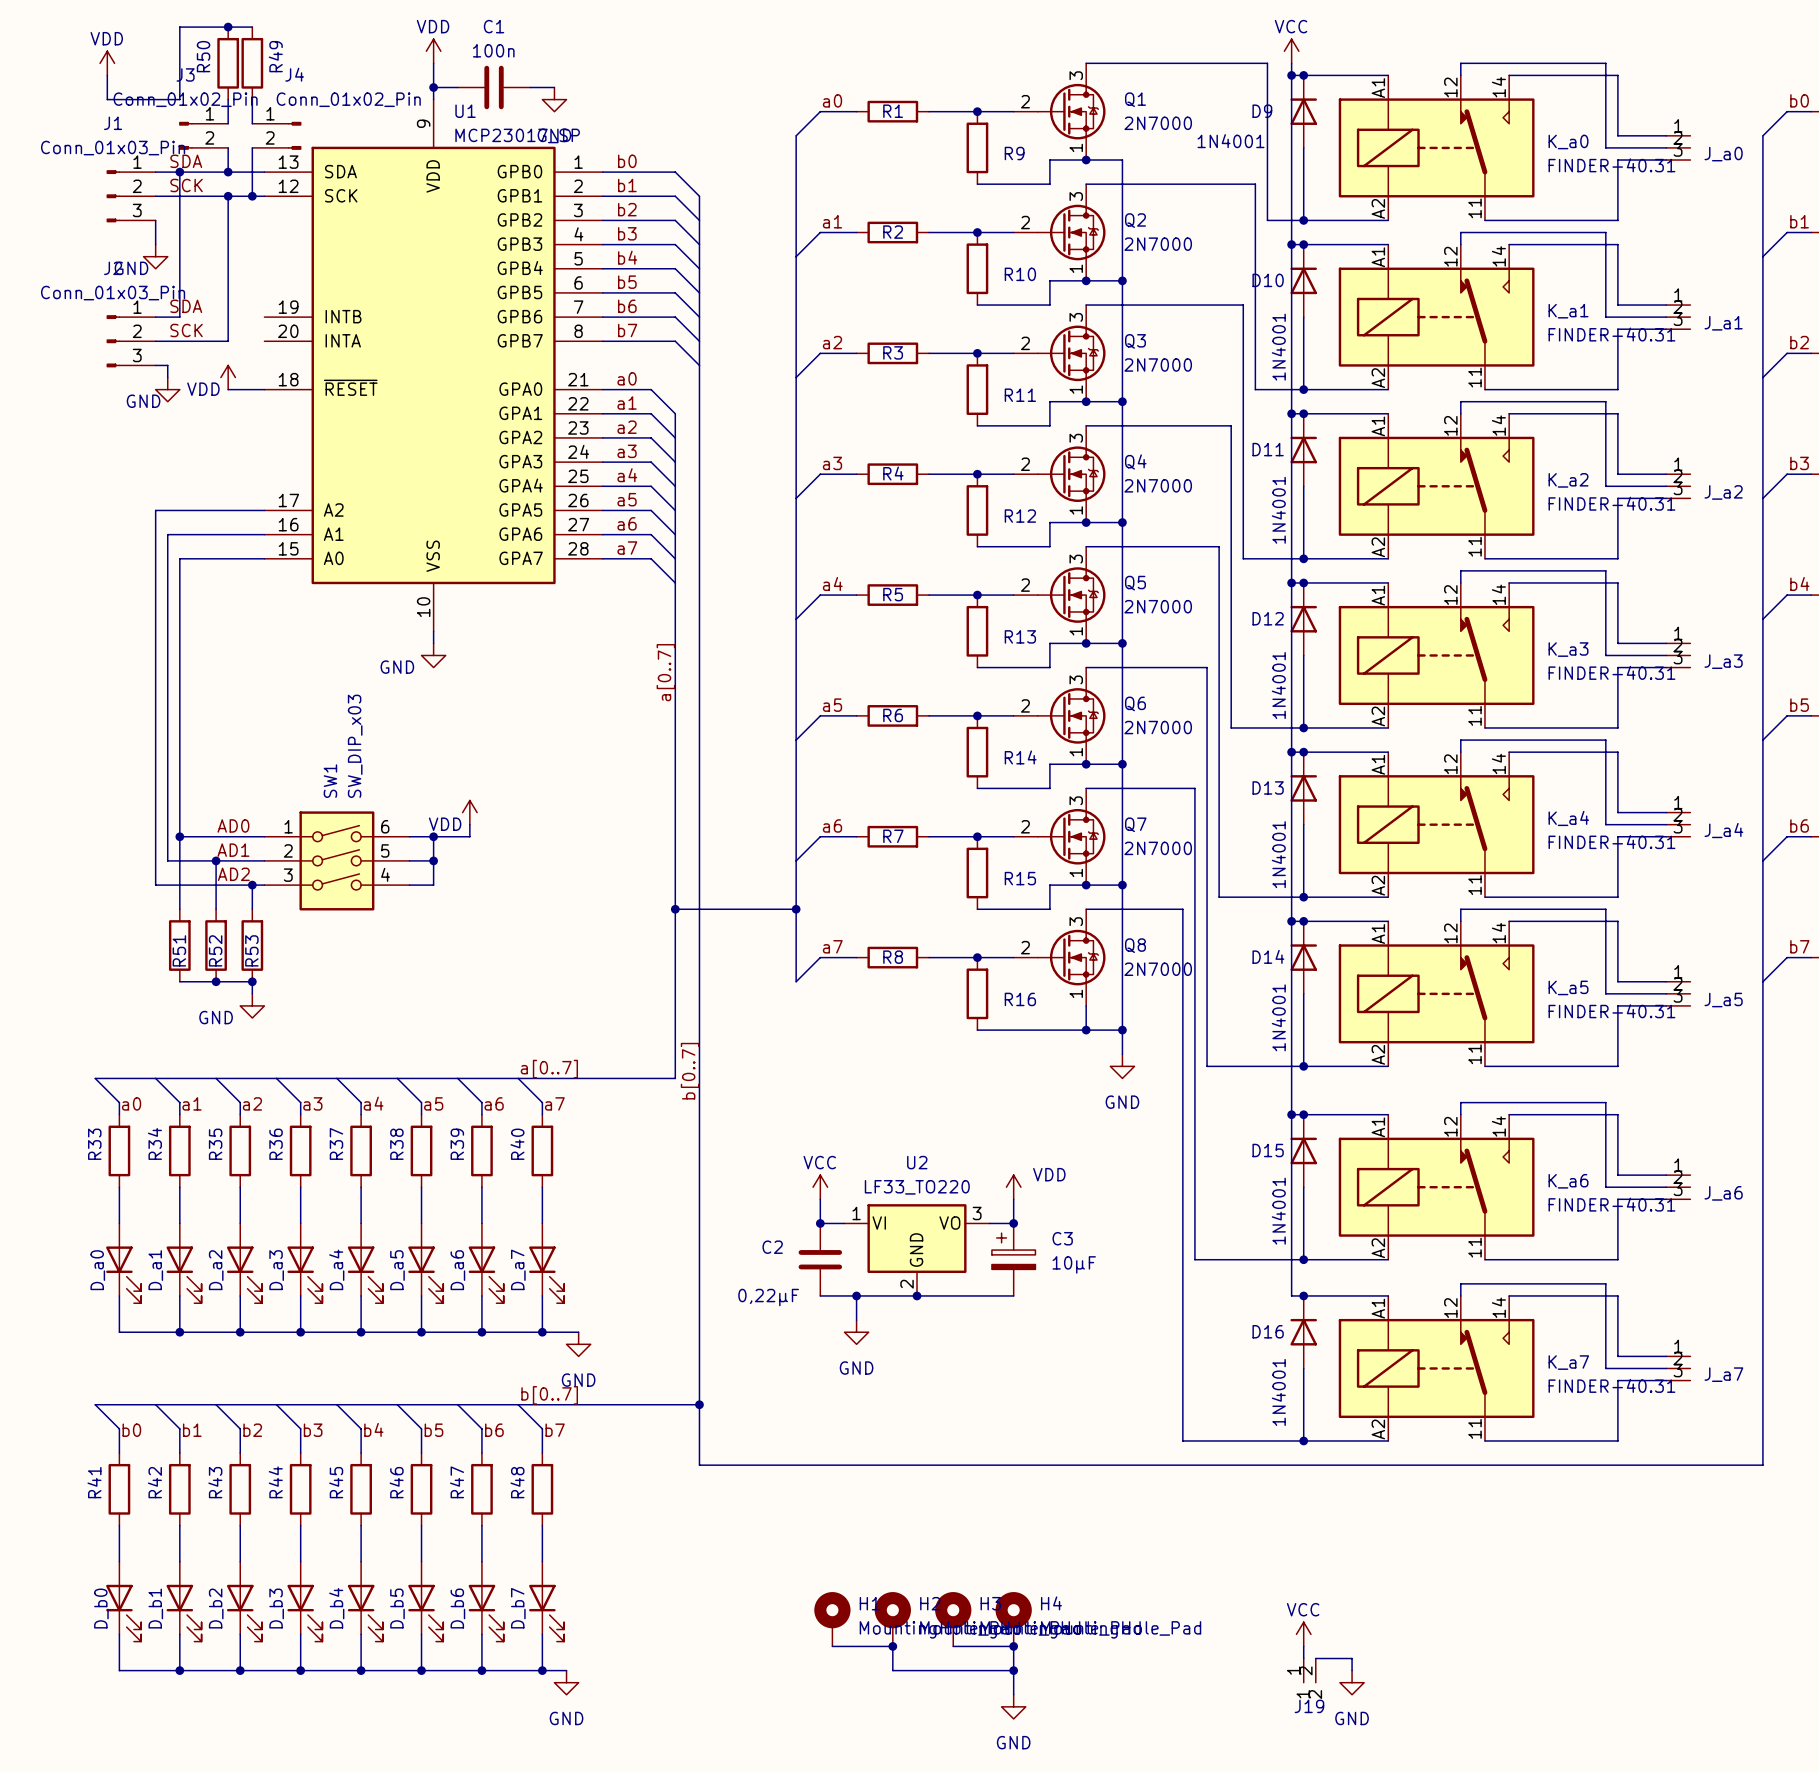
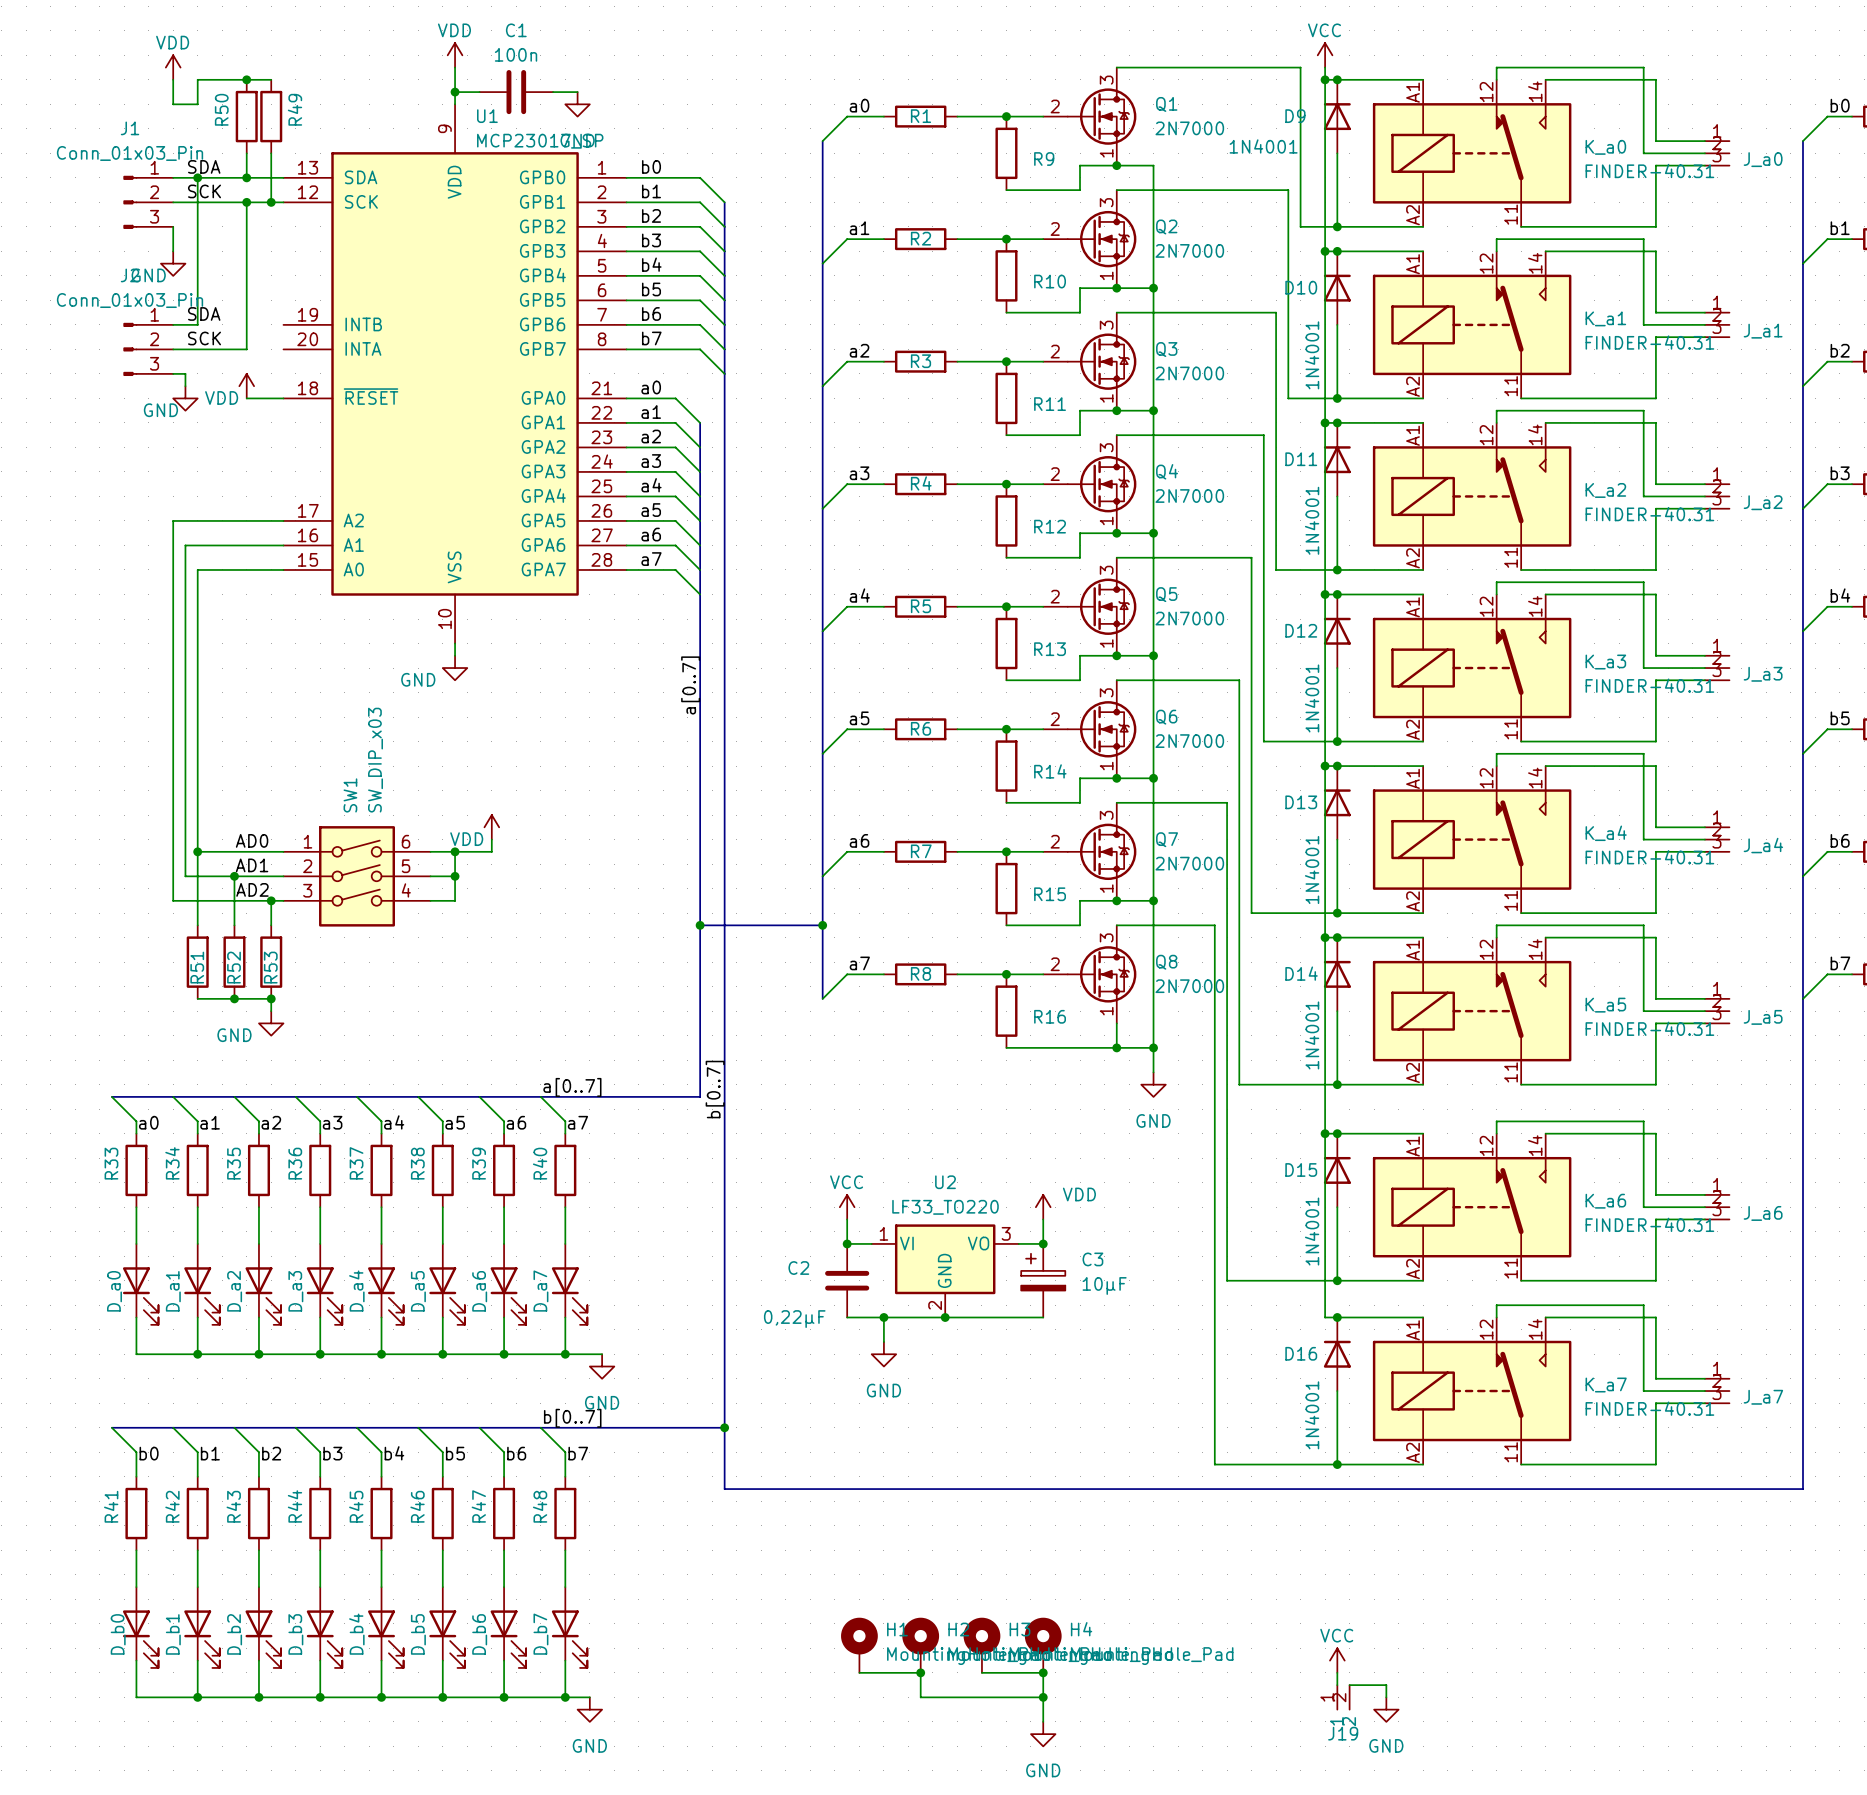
junction position: (228, 27) -> (246, 79)
wire: (252, 27) (179, 27) (179, 75) -> (271, 79) (197, 79)
power symbol position: VDD (107, 63) -> VDD (173, 67)
R50 position: (228, 63) -> (246, 116)
R49 position: (252, 63) -> (271, 116)
wire: (107, 75) (107, 99) (155, 99) -> (173, 79) (173, 104)
wire: (228, 99) (228, 123) -> none
wire: (252, 99) (252, 123) -> none
J3: Conn_01x02_Pin (203, 135) -> none
J4: Conn_01x02_Pin (276, 135) -> none

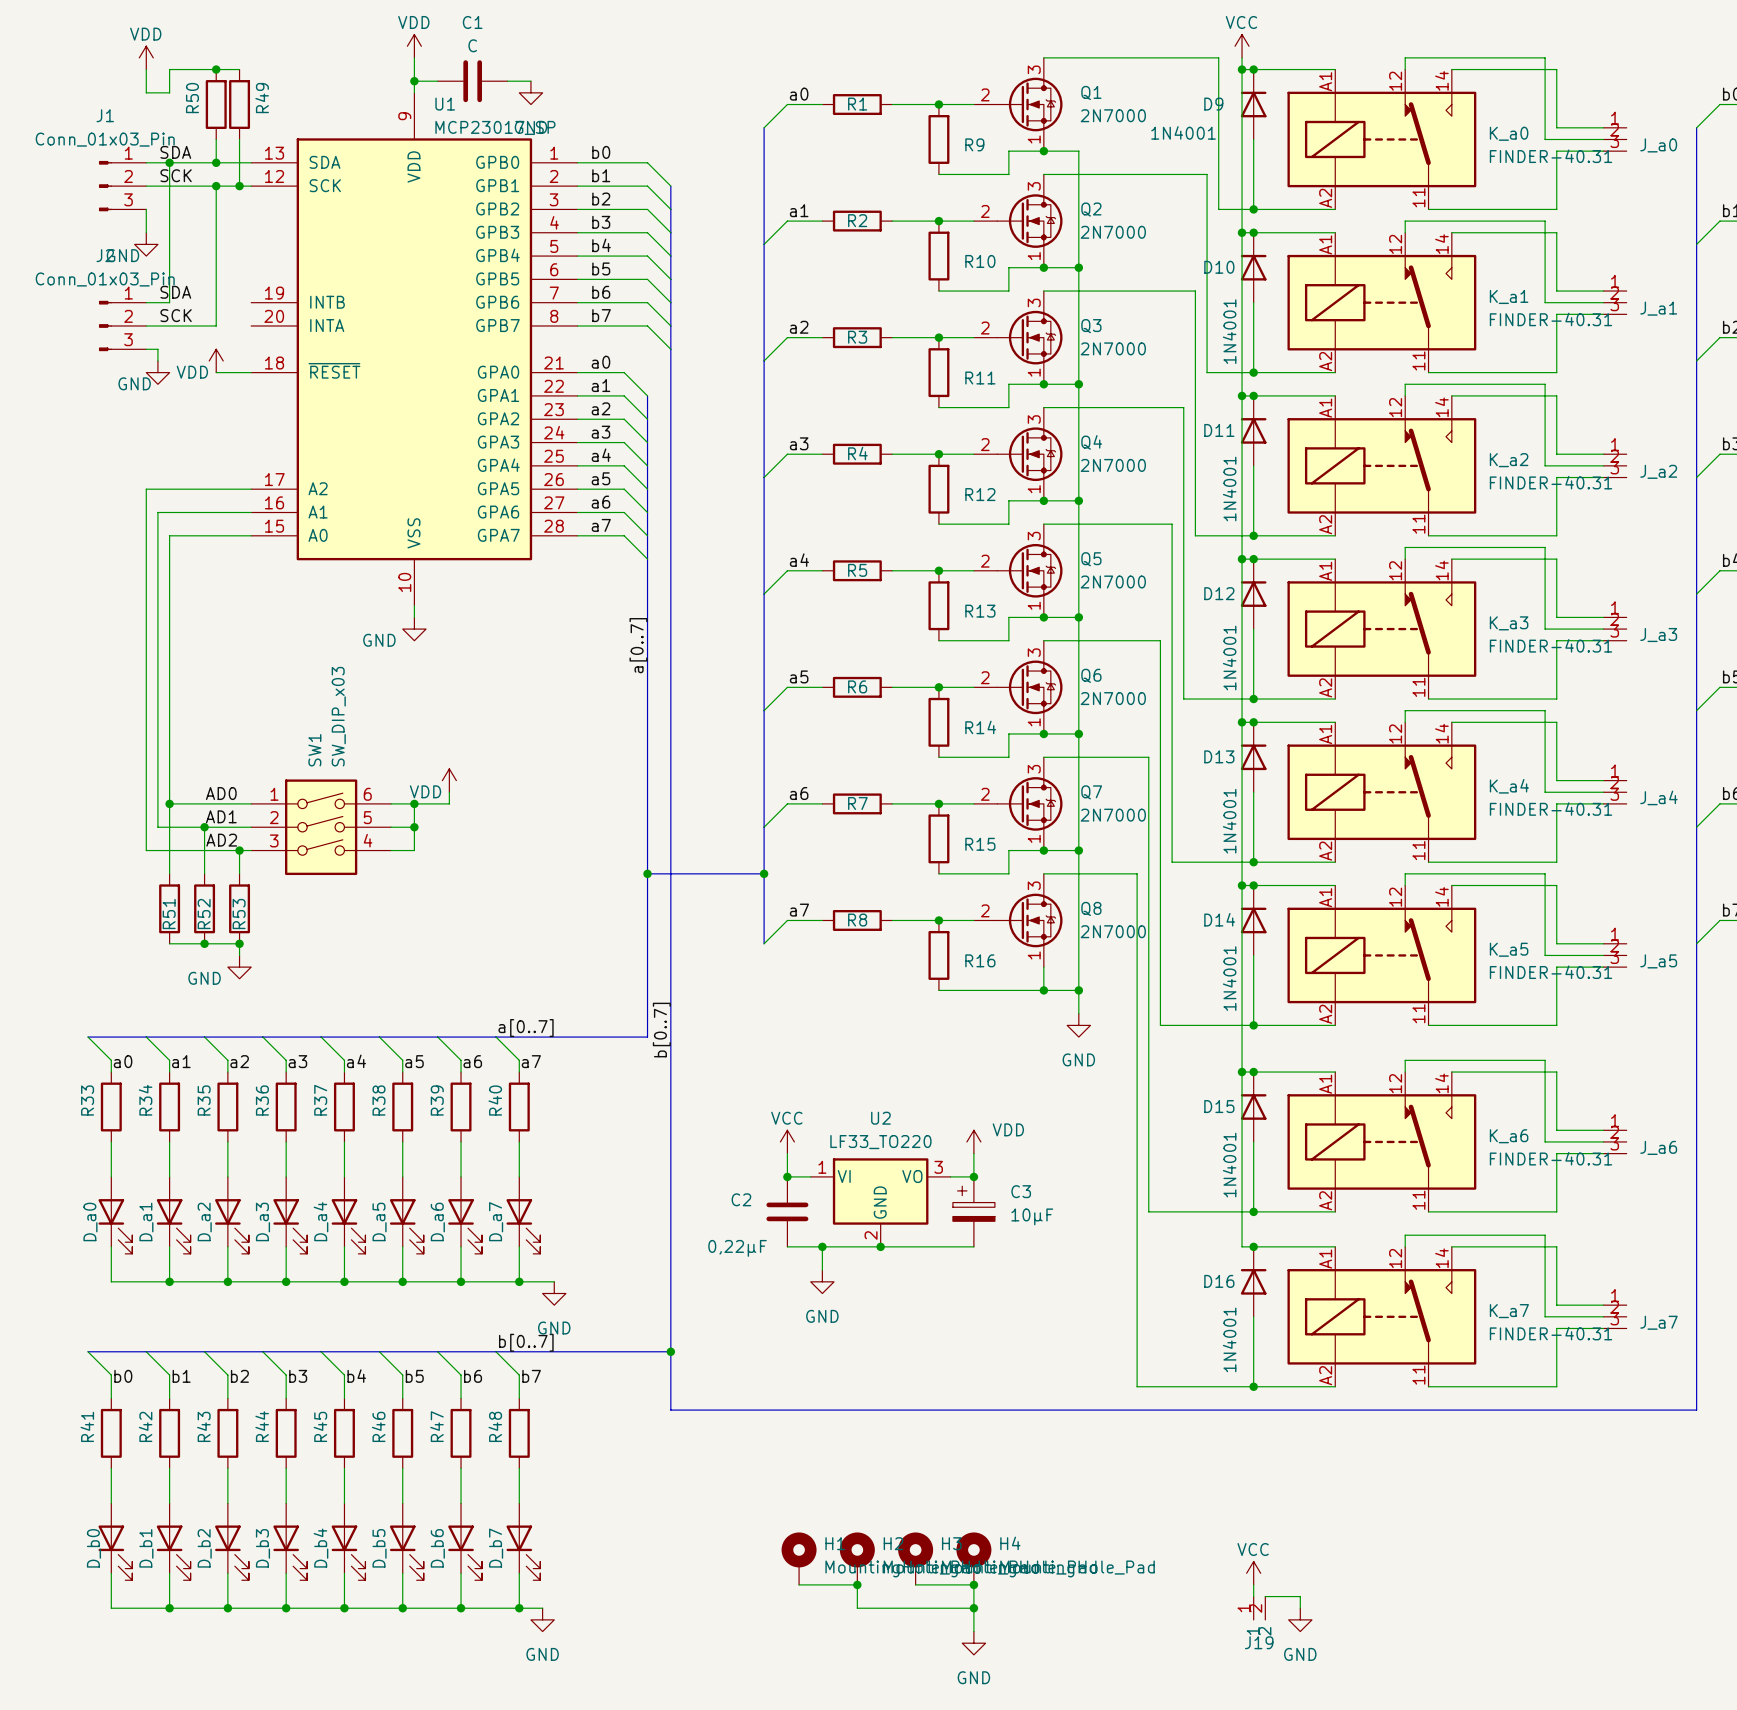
C1 value: 100n (516, 54) -> C (472, 45)

